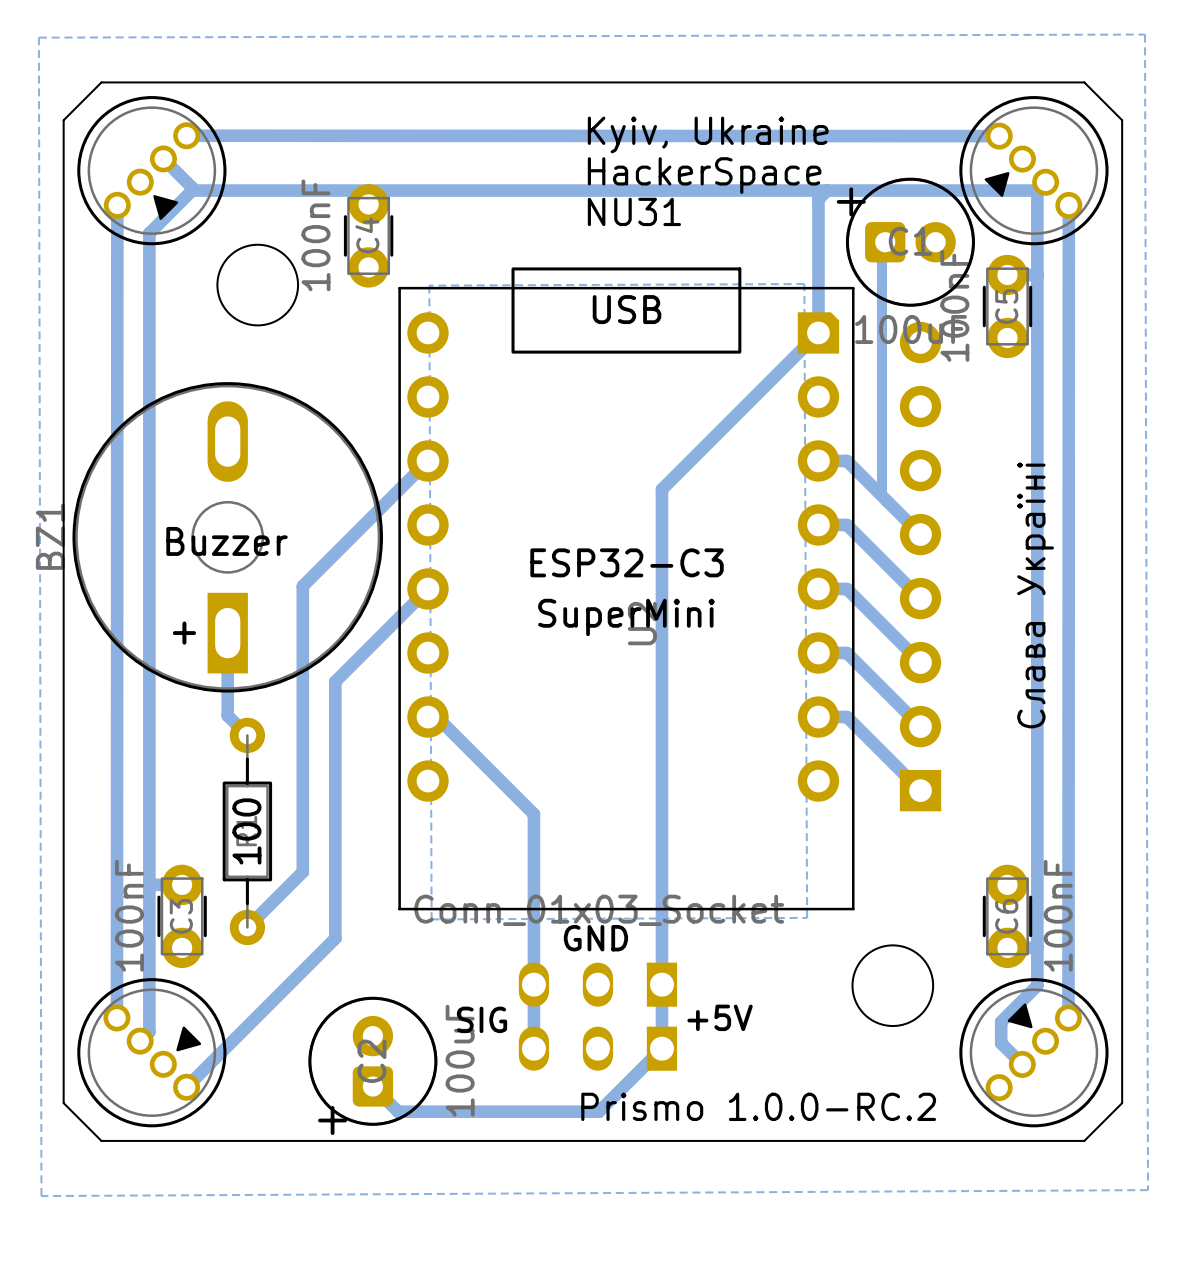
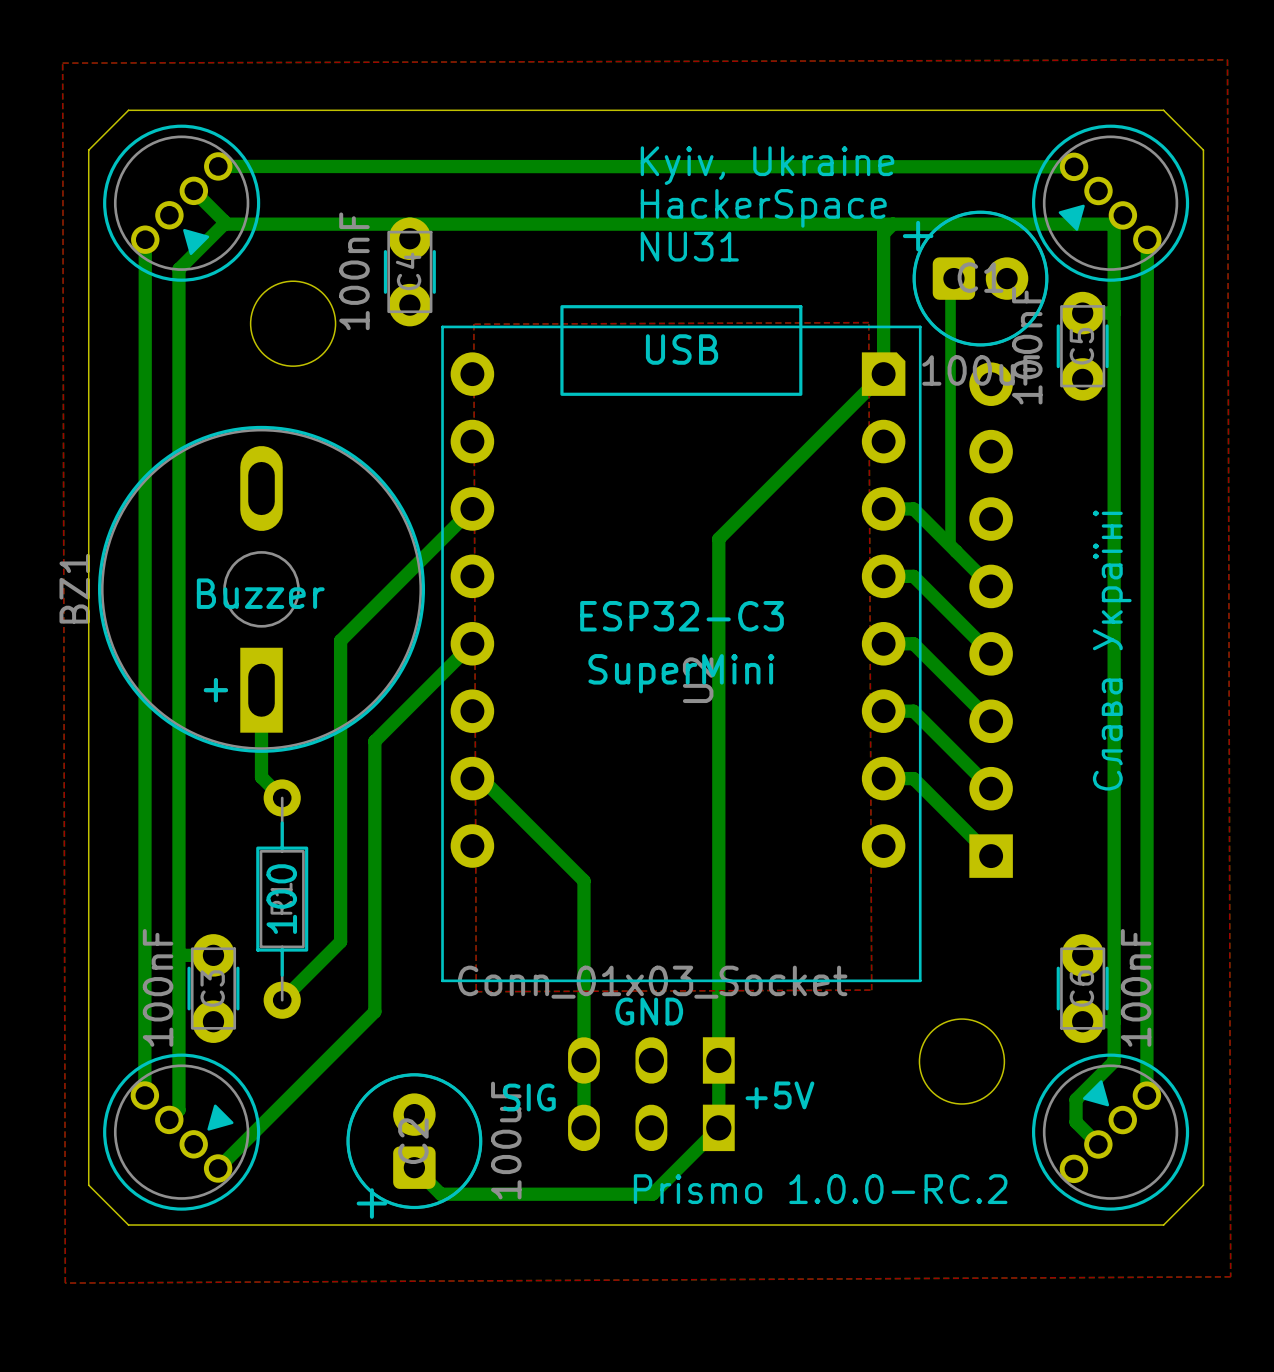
top zone outline: none -> (1227, 59) (62, 63) (65, 1283) (1230, 1276) (1227, 59)
top zone outline: none -> (868, 322) (871, 990) (476, 991) (473, 324) (868, 322)

